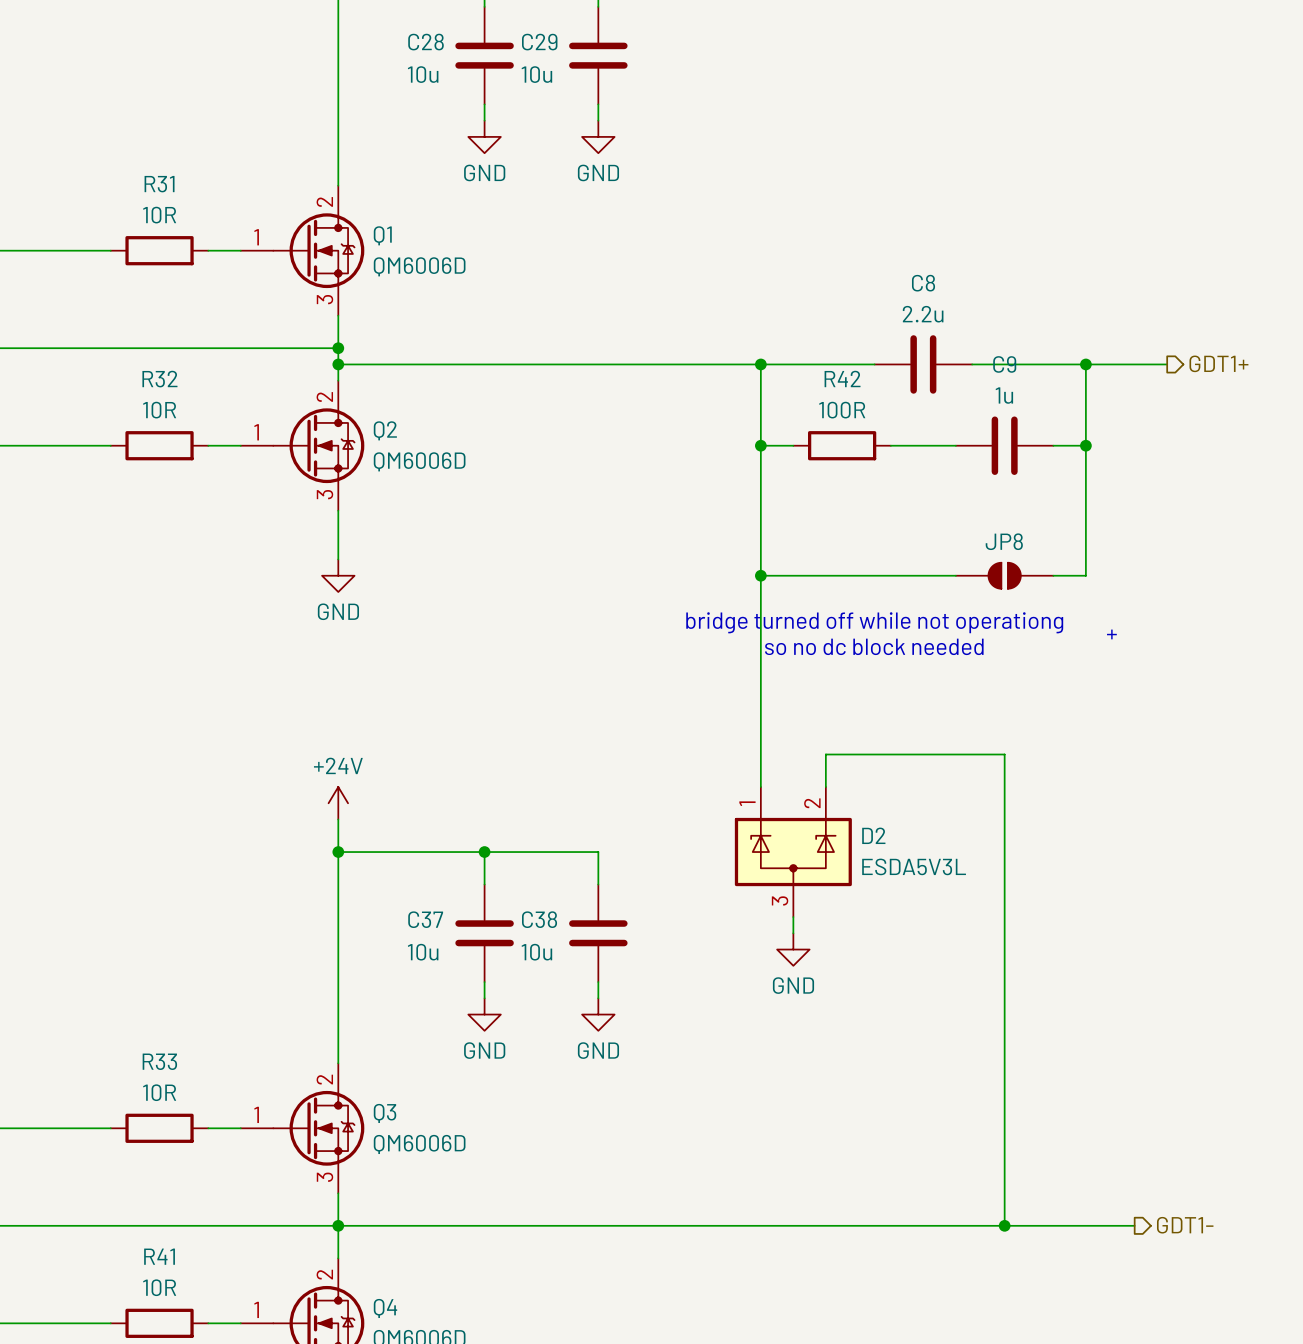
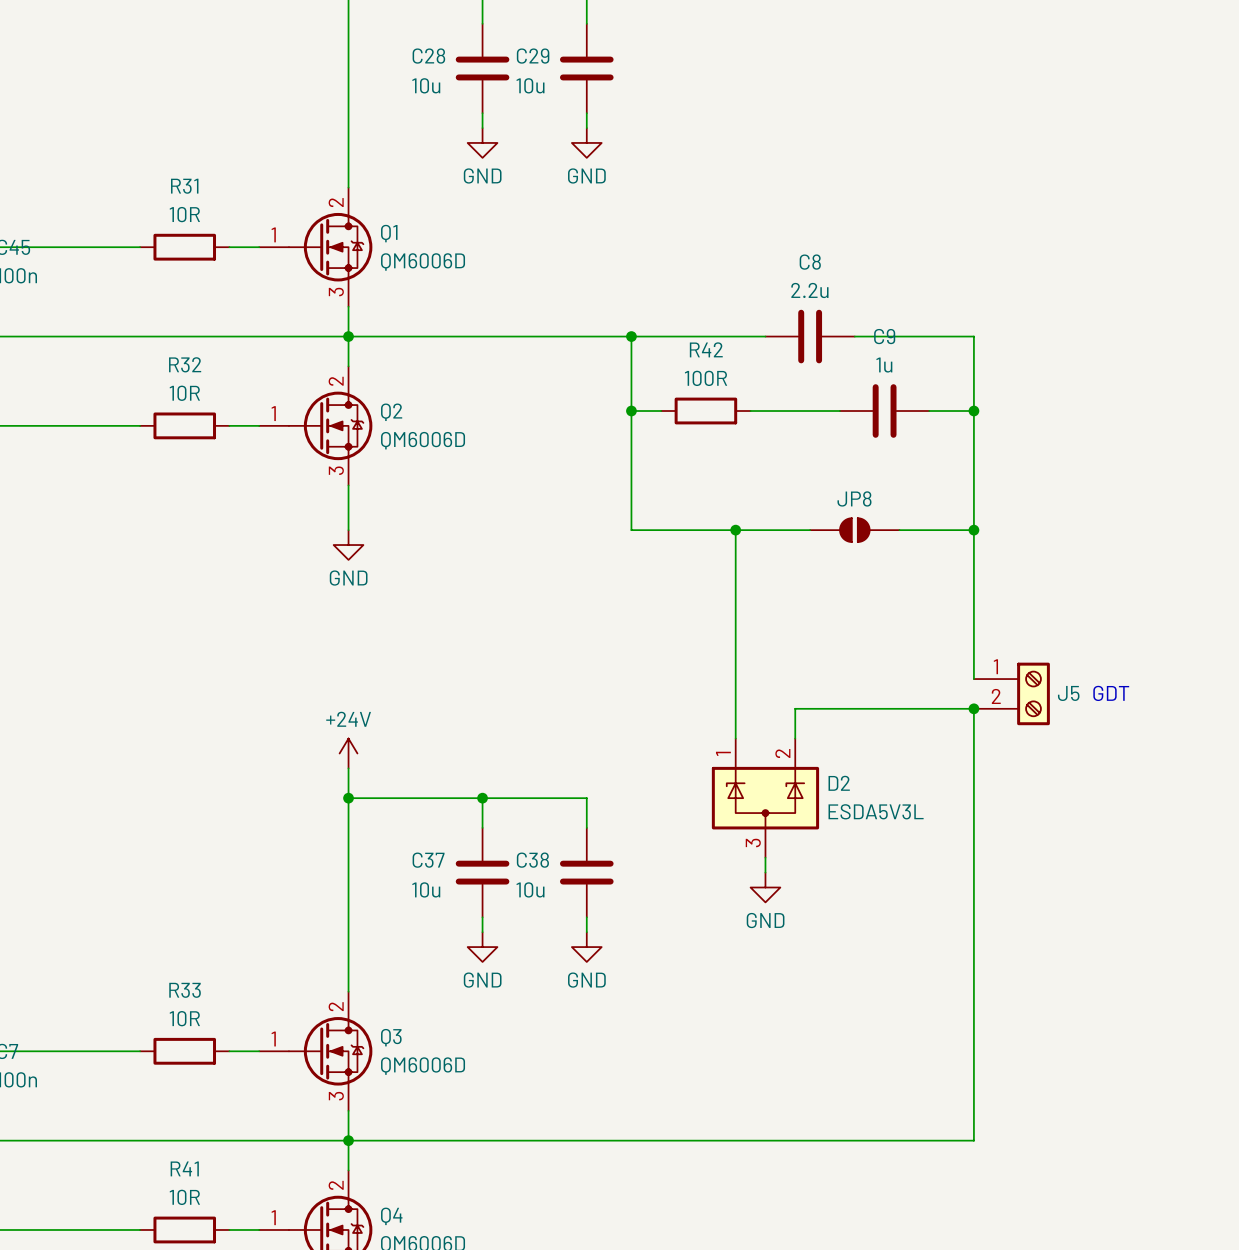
wire: none -> (348, 336) (765, 336)
wire: none -> (631, 336) (631, 530) (810, 530)
junction: none -> (631, 336)
wire: none -> (854, 336) (973, 336) (973, 679)
hierarchical label: GDT1+ (1218, 363) -> none
wire: (338, 364) (874, 364) -> none
junction: (338, 364) -> none
wire: (760, 364) (760, 559) -> none
junction: (760, 364) -> none
C8 position: (923, 364) -> (810, 336)
wire: (972, 364) (1167, 364) -> none
wire: (1085, 364) (1085, 575) (1053, 575) -> none
junction: (1085, 364) -> none
junction: none -> (631, 411)
wire: none -> (750, 411) (839, 411)
wire: none -> (929, 411) (973, 411)
junction: none -> (973, 411)
wire: (760, 445) (793, 445) -> (631, 411) (661, 411)
junction: (760, 445) -> none
R42 position: (842, 445) -> (705, 411)
wire: (890, 445) (955, 445) -> none
C9 position: (1004, 445) -> (884, 411)
wire: (1053, 445) (1085, 445) -> none
junction: (1085, 445) -> none
wire: none -> (899, 530) (973, 530)
junction: none -> (973, 530)
wire: (760, 575) (955, 575) -> none
junction position: (760, 575) -> (735, 530)
JP8 position: (1004, 575) -> (854, 530)
text: bridge turned off while not operationg (874, 622) -> none
text: + (1111, 634) -> none
text: so no dc block needed (874, 646) -> none
text: none -> GDT (1111, 693)
J5: none -> (1011, 693)
wire: (1004, 754) (1004, 1225) -> (959, 708) (973, 708) (973, 1140)
junction: none -> (973, 708)
junction: (1004, 1225) -> none
wire: (1020, 1225) (1134, 1225) -> none
hierarchical label: GDT1- (1185, 1225) -> none

